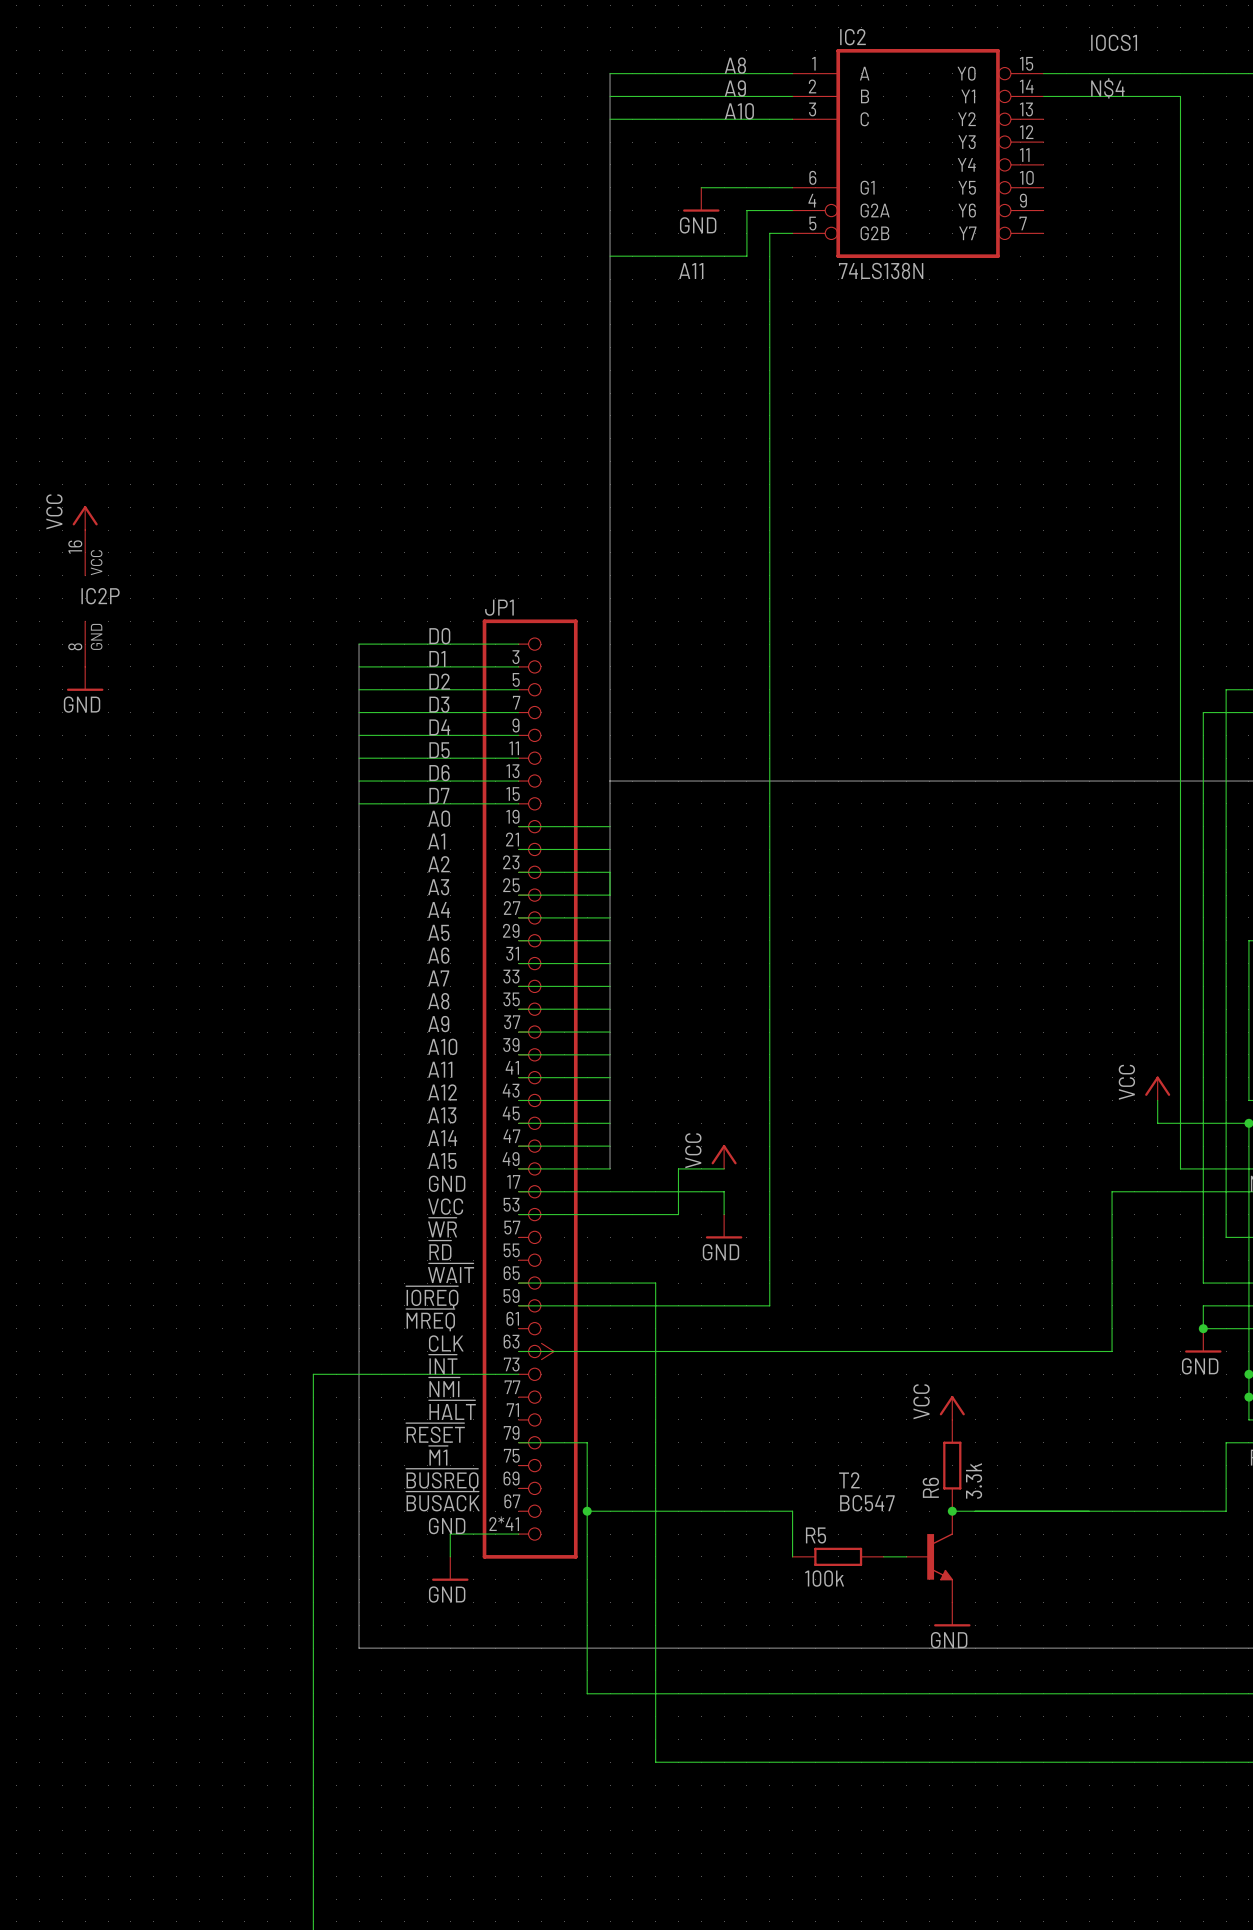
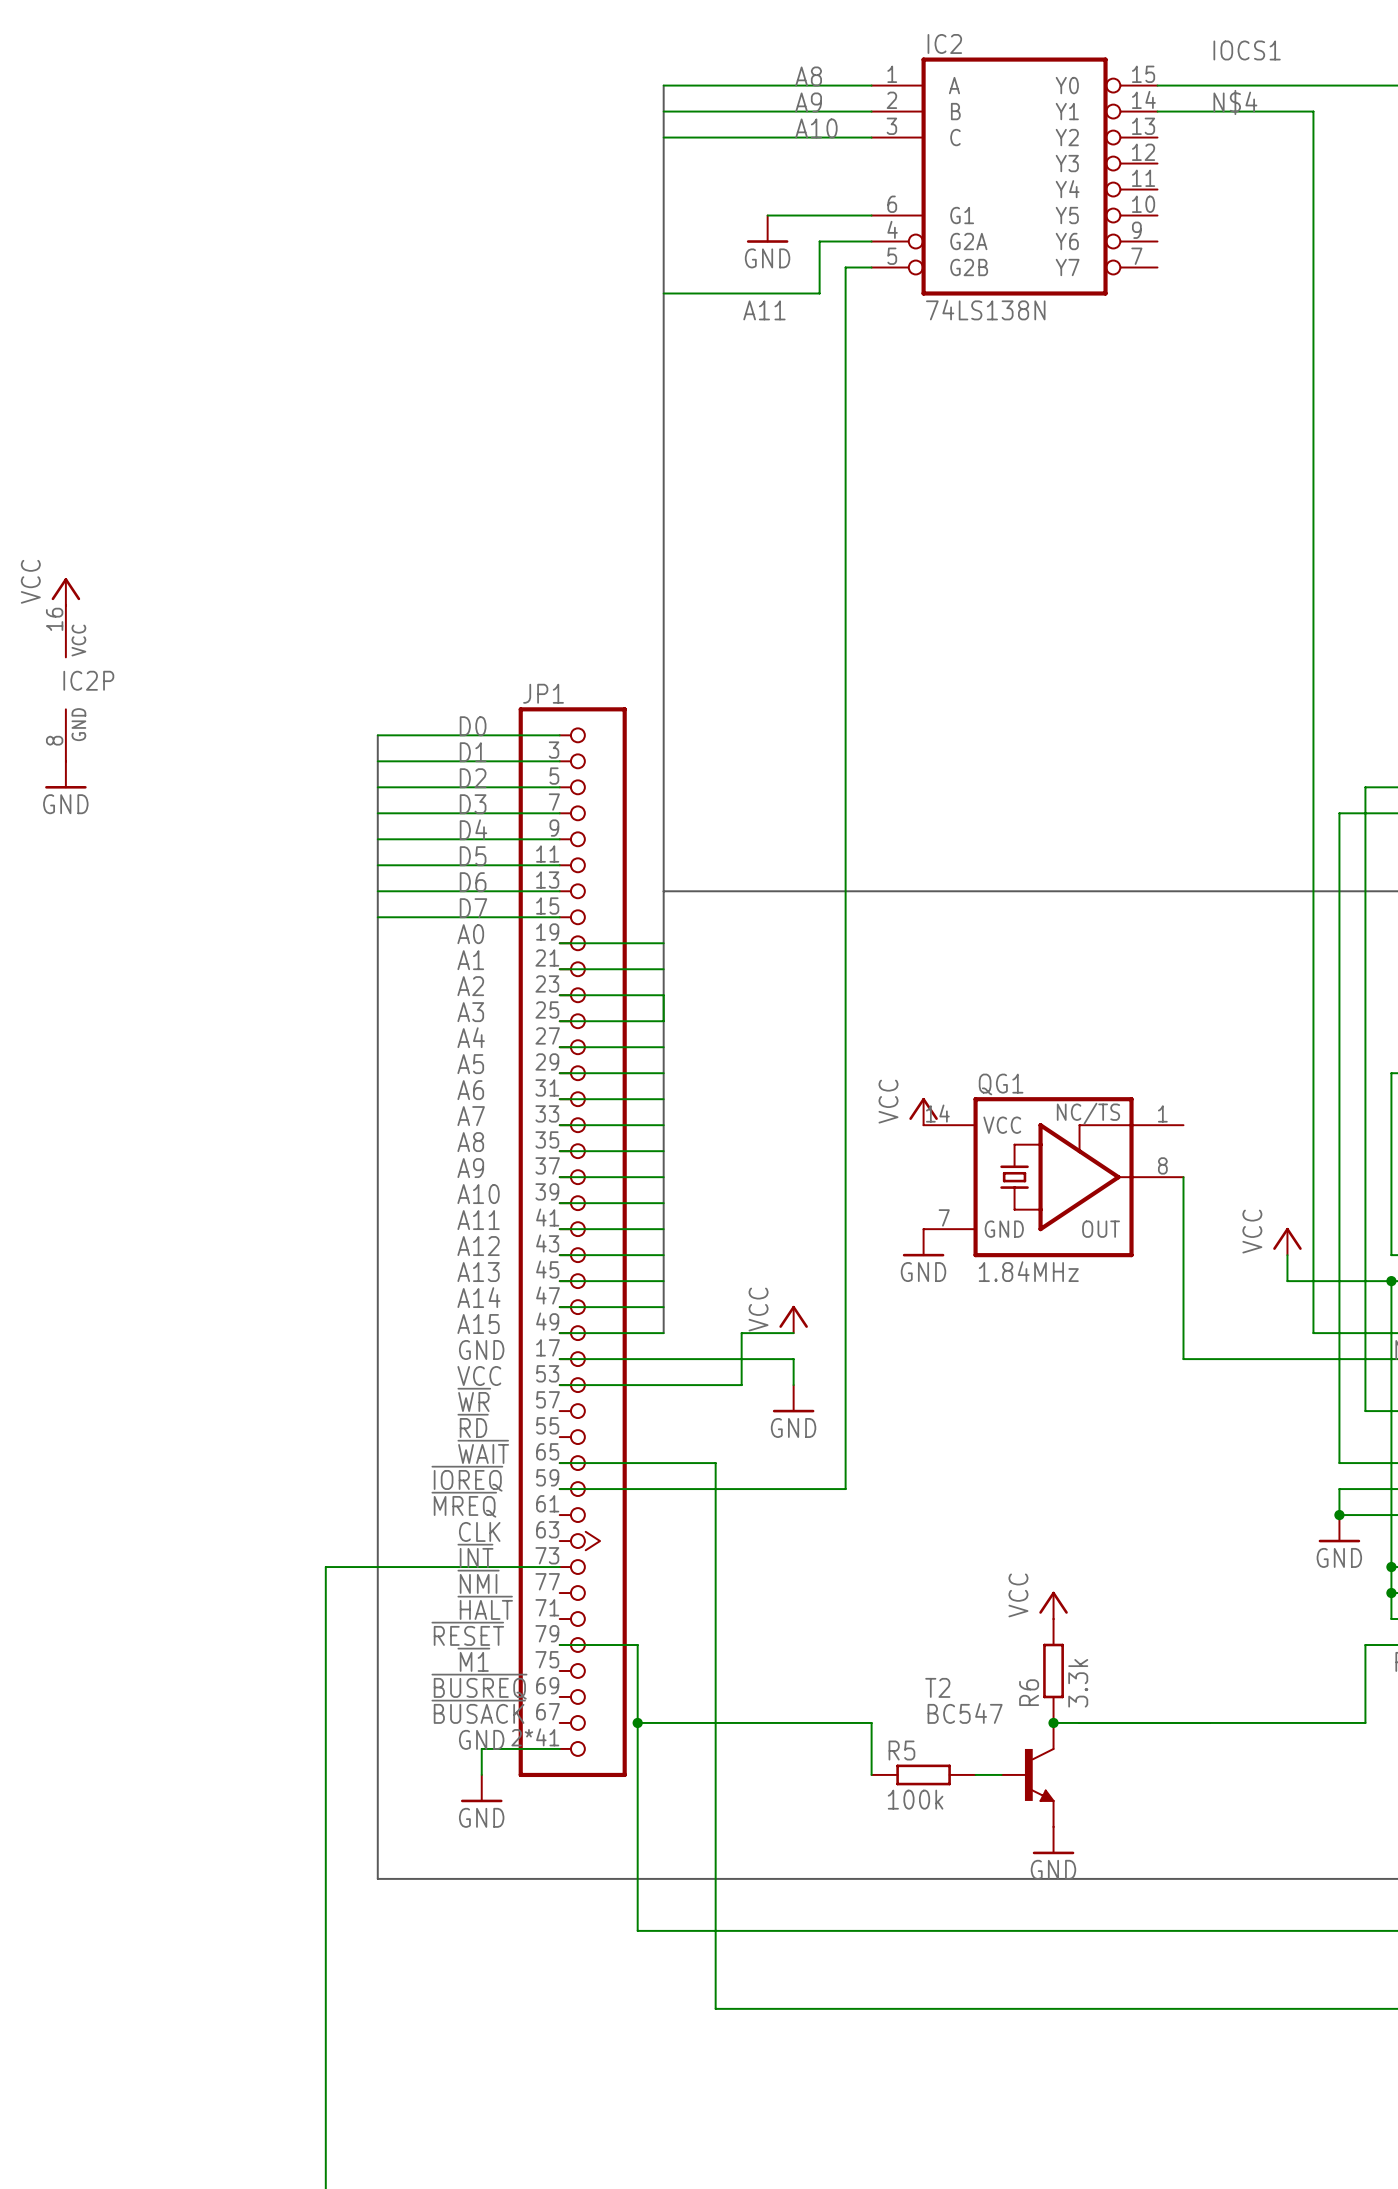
power symbol: none -> VCC (923, 1111)
QG1: none -> 1.84MHz (1053, 1177)
power symbol: none -> GND (923, 1242)
wire: (1112, 1191) (1112, 1351) (518, 1351) -> (1235, 1359) (1183, 1359) (1183, 1177)

